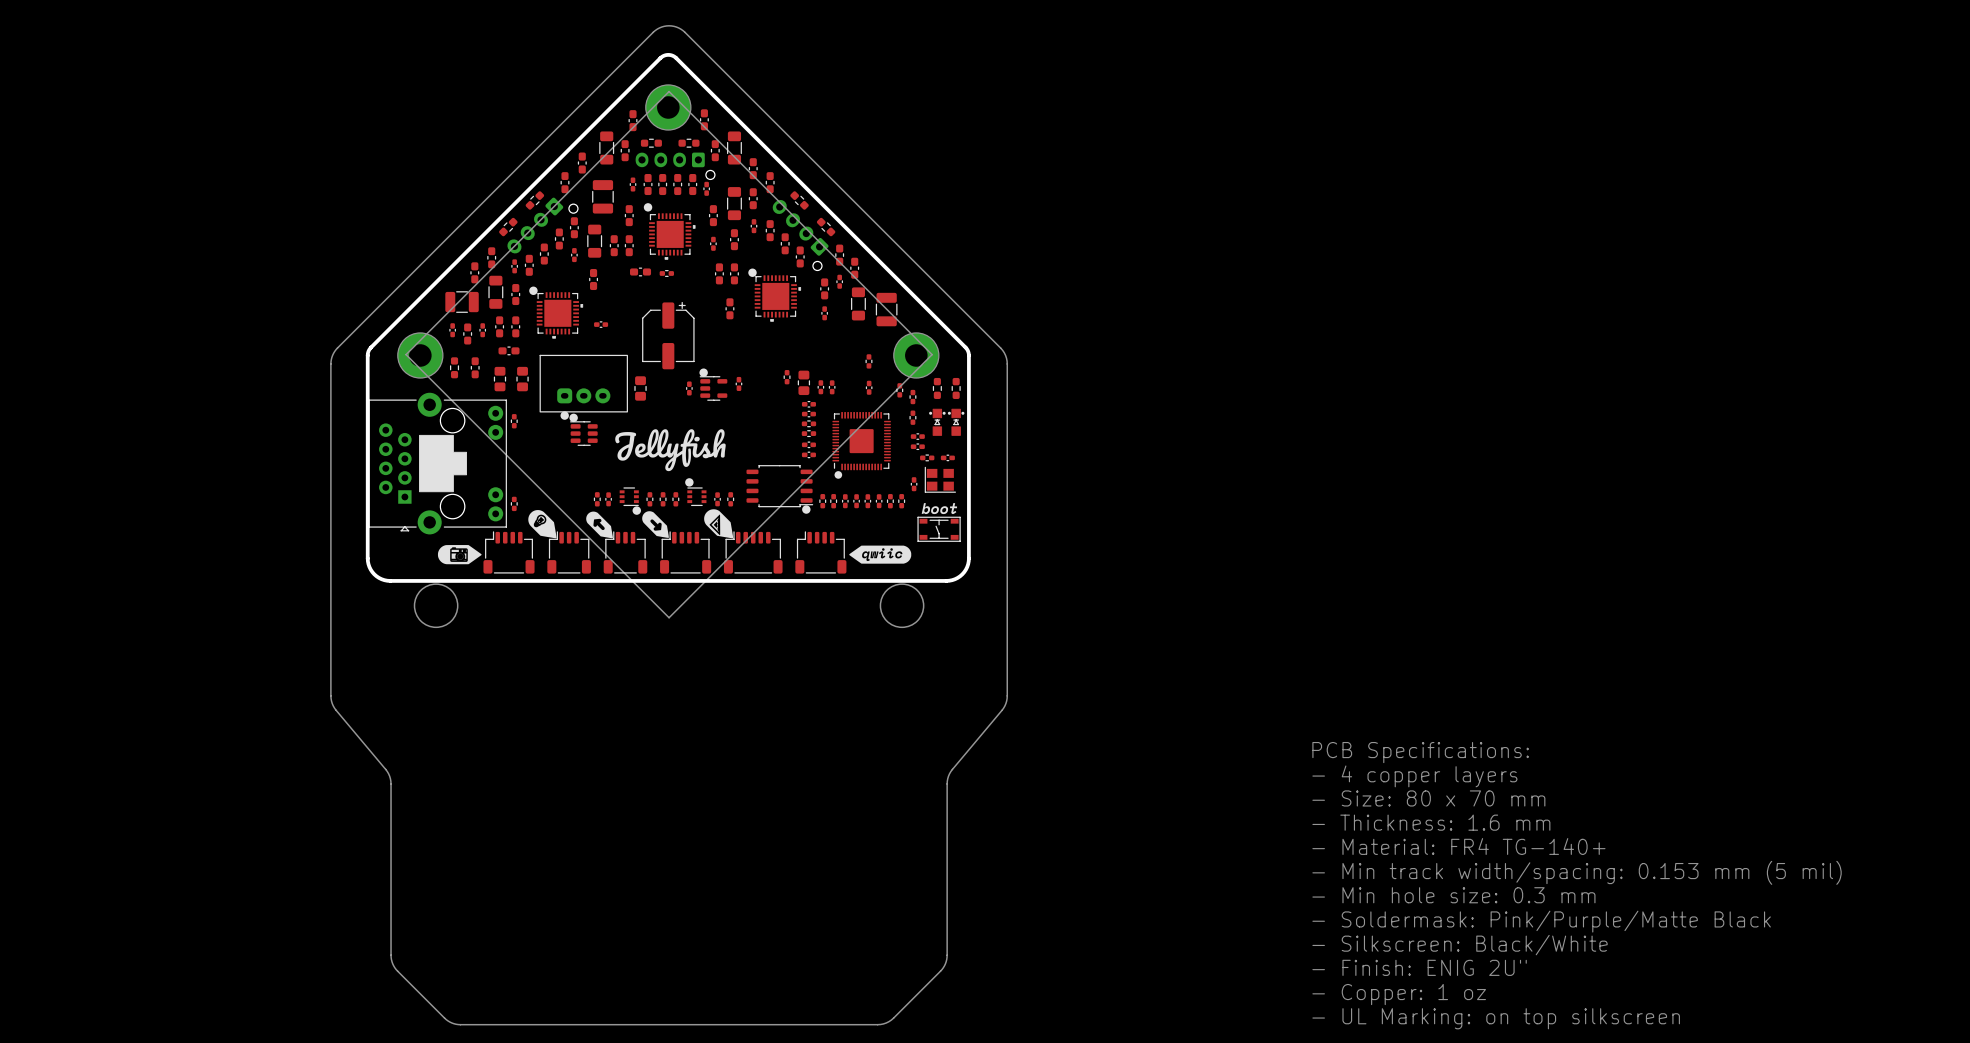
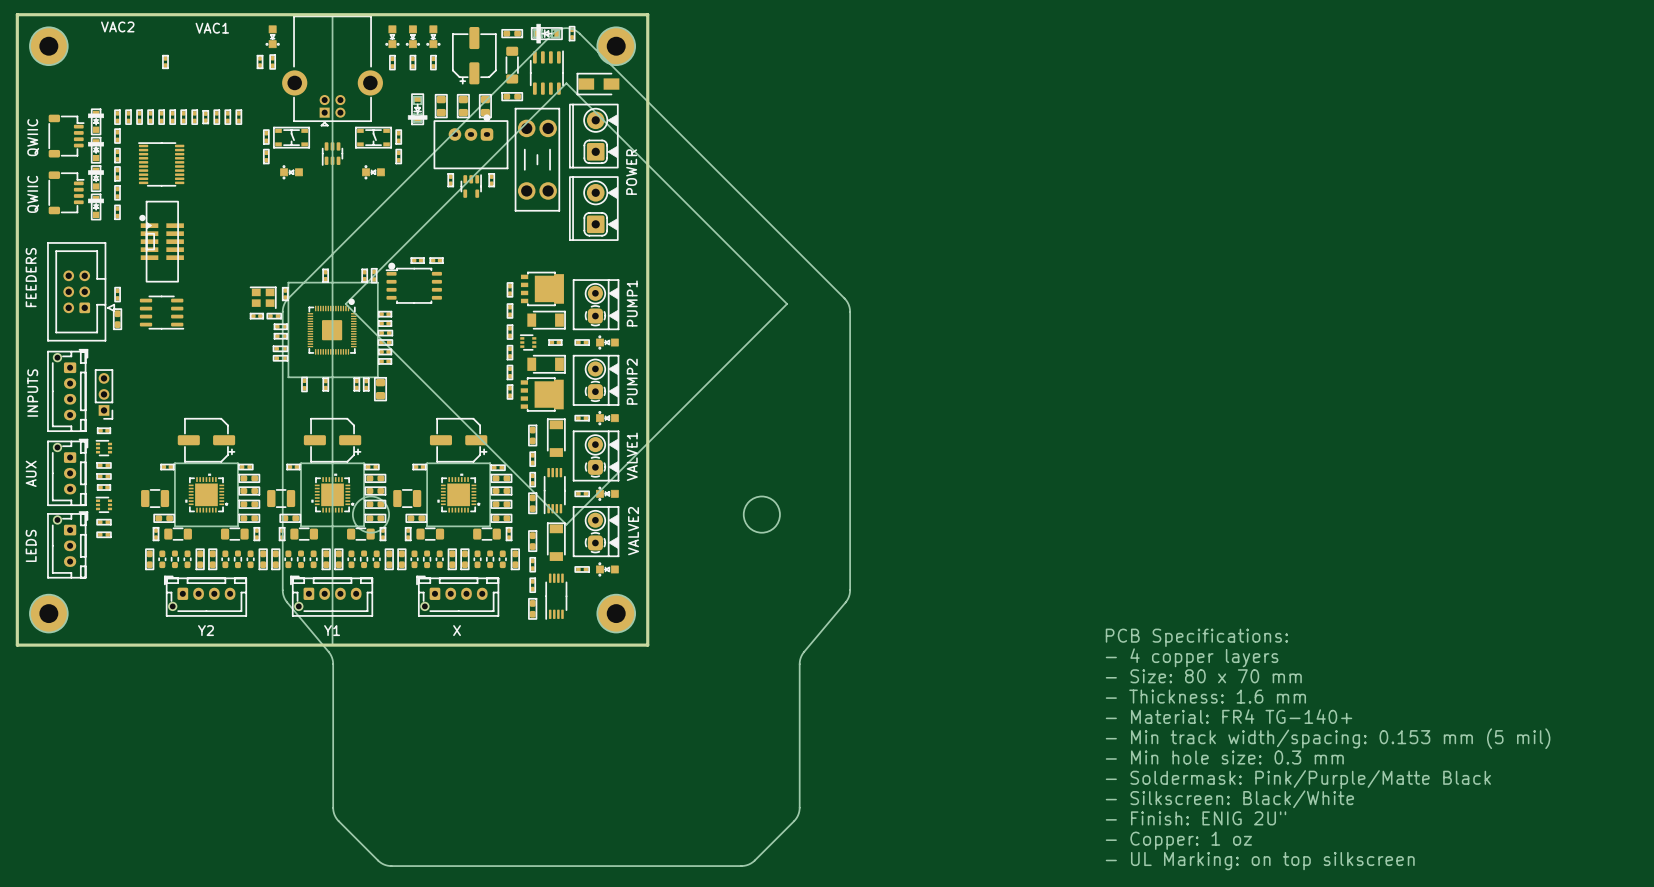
board edge: none -> (17, 14) (647, 14) (647, 645) (17, 645) (17, 14)
line: none -> (332, 14) (332, 645)
text: none -> VAC2 (117, 26)
text: none -> VAC1 (212, 28)
part: none -> (512, 33)
part: none -> (546, 33)
part: none -> (572, 33)
part: none -> (272, 36)
part: none -> (392, 36)
part: none -> (412, 36)
part: none -> (433, 36)
part: none -> (48, 46)
part: none -> (474, 55)
board edge: (660, 58) (369, 349) (367, 558) (370, 569) (379, 577) (390, 580) (946, 580) (957, 577) (965, 569) (968, 558) (967, 349) (676, 58) (668, 54) (660, 58) -> none
part: none -> (165, 61)
part: none -> (260, 61)
part: none -> (272, 61)
part: none -> (392, 62)
part: none -> (412, 62)
part: none -> (433, 62)
part: none -> (512, 65)
part: none -> (332, 70)
part: none -> (546, 72)
part: none -> (598, 84)
part: none -> (512, 96)
part position: (668, 107) -> (616, 46)
part: none -> (441, 106)
part: none -> (463, 106)
part: none -> (485, 106)
part: (704, 119) -> none
part: (633, 120) -> none
part: none -> (417, 109)
part: none -> (117, 117)
part: none -> (128, 117)
part: none -> (139, 117)
part: none -> (150, 117)
part: none -> (161, 117)
part: none -> (172, 117)
part: none -> (183, 117)
part: none -> (194, 117)
part: none -> (205, 117)
part: none -> (216, 117)
part: none -> (227, 117)
part: none -> (238, 117)
part: none -> (96, 121)
part: (651, 143) -> none
part: (688, 143) -> none
part: (606, 147) -> none
part: (734, 147) -> none
part: (625, 150) -> none
part: (715, 150) -> none
part: none -> (66, 136)
part: none -> (117, 136)
part: none -> (593, 136)
part: none -> (266, 137)
part: none -> (398, 137)
text: none -> QWIIC (33, 137)
part: none -> (291, 137)
part: none -> (373, 137)
part: none -> (470, 141)
part: (582, 163) -> none
part: (675, 166) -> none
part: (753, 168) -> none
part: none -> (96, 150)
part: none -> (332, 153)
part: none -> (117, 155)
part footprint: [629, 177, 637, 192] -> [515, 108, 560, 212]
part: none -> (266, 156)
part: none -> (398, 156)
part: (564, 182) -> none
part: (770, 182) -> none
part: (648, 184) -> none
part: (662, 184) -> none
part: (677, 184) -> none
part: (692, 184) -> none
part: none -> (161, 164)
part: (706, 188) -> none
part: (602, 196) -> none
part: none -> (291, 172)
part: none -> (373, 172)
text: none -> POWER (631, 172)
part: (753, 198) -> none
part: none -> (117, 173)
part: (534, 200) -> none
part: (799, 200) -> none
drawing: [643, 203, 653, 212] -> none
part: (734, 203) -> none
part: none -> (96, 178)
part: none -> (450, 180)
part: none -> (491, 180)
part: none -> (471, 186)
part: (629, 215) -> none
part: (713, 215) -> none
part: none -> (66, 192)
part: none -> (117, 192)
text: none -> QWIIC (33, 194)
part: (542, 225) -> none
part: (754, 226) -> none
part: (508, 227) -> none
part: (574, 227) -> none
part: (826, 227) -> none
part: (770, 230) -> none
part: (800, 235) -> none
part: (672, 236) -> none
part: none -> (96, 206)
part: (559, 239) -> none
part: (734, 239) -> none
part: none -> (593, 208)
part: (594, 241) -> none
part: (713, 243) -> none
part: (785, 243) -> none
part: none -> (117, 212)
part: (614, 245) -> none
part: (629, 245) -> none
part: (544, 254) -> none
part: (574, 255) -> none
part: (839, 255) -> none
part: (800, 256) -> none
part: (491, 257) -> none
part: (529, 265) -> none
part: (514, 266) -> none
drawing: [748, 268, 757, 277] -> none
part: (854, 268) -> none
part: (640, 271) -> none
part: (474, 272) -> none
part: (666, 273) -> none
part: (719, 273) -> none
part: (734, 273) -> none
part: (593, 279) -> none
part: none -> (161, 241)
part: (839, 281) -> none
part: (824, 288) -> none
drawing position: (533, 290) -> (391, 266)
part: (495, 292) -> none
part: (515, 294) -> none
part: (777, 298) -> none
part: (462, 302) -> none
part: none -> (417, 260)
part: none -> (436, 260)
part: (858, 303) -> none
part: (729, 308) -> none
part: (886, 309) -> none
part: (824, 313) -> none
part: (559, 315) -> none
part: none -> (325, 275)
part: none -> (364, 275)
part: none -> (374, 275)
text: none -> FEEDERS (31, 277)
part footprint: [479, 323, 486, 338] -> [386, 268, 442, 304]
part: (601, 324) -> none
part: (499, 326) -> none
part: (515, 326) -> none
line: none -> (288, 282) (288, 377) (377, 377) (377, 282) (288, 282)
part: (452, 330) -> none
part: (467, 333) -> none
part: (668, 335) -> none
part: none -> (542, 288)
part: none -> (510, 289)
part: none -> (81, 291)
part: none -> (285, 294)
part: none -> (117, 294)
part: none -> (263, 297)
part: (509, 350) -> none
text: none -> PUMP1 (632, 303)
part: (420, 355) -> none
part: none -> (596, 304)
part: (916, 355) -> none
part footprint: [450, 357, 459, 379] -> [378, 311, 392, 318]
part: (868, 361) -> none
part: none -> (510, 310)
part: none -> (161, 312)
part: (475, 367) -> none
drawing: [699, 368, 708, 377] -> none
part: none -> (256, 316)
part: none -> (274, 316)
part: none -> (117, 319)
part: none -> (546, 320)
part: (787, 377) -> none
part: none -> (385, 323)
part: (499, 379) -> none
part: (522, 379) -> none
part: none -> (280, 326)
part: none -> (332, 326)
part: (803, 382) -> none
part: (738, 383) -> none
part: (583, 387) -> none
part: (820, 387) -> none
part: (832, 387) -> none
part: (869, 387) -> none
part: none -> (510, 332)
part: (640, 388) -> none
part: (689, 388) -> none
part: (713, 388) -> none
part: (937, 388) -> none
part: (956, 388) -> none
part: none -> (385, 333)
part: (899, 390) -> none
part: none -> (280, 336)
part: (912, 397) -> none
part: none -> (385, 342)
part: none -> (528, 342)
part: none -> (555, 342)
part: none -> (582, 342)
part: none -> (607, 342)
part: (808, 404) -> none
part: none -> (280, 348)
part: none -> (385, 351)
part: none -> (510, 352)
drawing: [569, 413, 578, 423] -> none
part: (808, 414) -> none
part: (912, 417) -> none
part: none -> (280, 358)
part: (514, 421) -> none
part: (937, 422) -> none
part: (956, 422) -> none
part: none -> (385, 361)
part: (808, 423) -> none
part: none -> (546, 364)
drawing: [615, 429, 726, 487] -> none
part: (583, 433) -> none
part: (808, 433) -> none
part: none -> (510, 372)
part: (917, 436) -> none
part: (808, 444) -> none
part: none -> (596, 380)
part: (861, 445) -> none
part: (917, 446) -> none
text: none -> PUMP2 (632, 381)
part: none -> (304, 384)
part: none -> (325, 384)
part: none -> (356, 384)
part: none -> (366, 384)
part: (808, 454) -> none
part: none -> (380, 389)
part: none -> (67, 390)
part: (927, 457) -> none
part: (947, 457) -> none
part: none -> (510, 392)
text: none -> INPUTS (32, 393)
part: none -> (104, 394)
part: none -> (542, 394)
part: (437, 463) -> none
part: (940, 479) -> none
part: (914, 484) -> none
part: (779, 486) -> none
part: none -> (582, 418)
part: none -> (607, 418)
part: (629, 496) -> none
part: (696, 496) -> none
part: (597, 499) -> none
part: (608, 499) -> none
part: (649, 499) -> none
part: (663, 499) -> none
part: (675, 499) -> none
part: (717, 499) -> none
part: (730, 499) -> none
part: (822, 501) -> none
part: (833, 501) -> none
part: (845, 501) -> none
part: (856, 501) -> none
part: (867, 501) -> none
part: (879, 501) -> none
part: (890, 501) -> none
part: (901, 501) -> none
part: (514, 503) -> none
drawing: [921, 503, 958, 515] -> none
part: none -> (104, 430)
drawing: [802, 505, 811, 514] -> none
drawing: [632, 506, 669, 538] -> none
drawing: [704, 509, 734, 539] -> none
drawing: [528, 510, 557, 539] -> none
drawing: [586, 511, 613, 539] -> none
part: none -> (532, 435)
part: none -> (556, 437)
part: none -> (206, 440)
part: none -> (332, 440)
part: none -> (458, 440)
part: none -> (104, 448)
part: (939, 529) -> none
part: none -> (596, 455)
text: none -> VALVE1 (632, 456)
part: none -> (532, 459)
line: none -> (174, 463) (237, 463) (237, 526) (174, 526) (174, 463)
line: none -> (301, 463) (301, 526) (364, 526) (364, 463) (301, 463)
line: none -> (427, 463) (490, 463) (490, 526) (427, 526) (427, 463)
drawing: [437, 545, 482, 565] -> none
drawing: [849, 545, 912, 564] -> none
part: none -> (104, 465)
part: none -> (167, 467)
part: none -> (245, 467)
part: none -> (293, 467)
part: none -> (371, 467)
part: none -> (419, 467)
part: none -> (498, 467)
part: (509, 552) -> none
part: (569, 552) -> none
part: (625, 552) -> none
part: (685, 552) -> none
part: (753, 552) -> none
part: (820, 552) -> none
part: none -> (67, 472)
text: none -> AUX (31, 473)
part: none -> (104, 476)
part: none -> (249, 478)
part: none -> (375, 478)
part: none -> (501, 478)
part: none -> (532, 479)
part: none -> (104, 487)
part: none -> (249, 490)
part: none -> (375, 490)
part: none -> (501, 490)
part: none -> (554, 490)
part: none -> (204, 493)
part: none -> (330, 493)
part: none -> (456, 493)
part: none -> (582, 493)
part: none -> (607, 493)
part: none -> (155, 498)
part: none -> (281, 498)
part: none -> (407, 498)
part: none -> (532, 503)
part: none -> (249, 504)
part: none -> (375, 504)
part: none -> (501, 504)
part: none -> (104, 504)
part: none -> (164, 518)
part: none -> (249, 518)
part: none -> (290, 518)
part: none -> (375, 518)
part: none -> (416, 518)
part: none -> (501, 518)
part: none -> (104, 522)
text: none -> VALVE2 (633, 531)
part: none -> (596, 531)
part: none -> (156, 534)
part: none -> (178, 534)
part: none -> (234, 534)
part: none -> (256, 534)
part: none -> (282, 534)
part: none -> (304, 534)
part: none -> (360, 534)
part: none -> (382, 534)
part: none -> (408, 534)
part: none -> (430, 534)
part: none -> (486, 534)
part: none -> (509, 534)
part: none -> (104, 534)
part: none -> (532, 541)
part: none -> (556, 541)
part: none -> (67, 544)
text: none -> LEDS (31, 545)
part: none -> (149, 559)
part: none -> (162, 559)
part: none -> (174, 559)
part: none -> (187, 559)
part: none -> (200, 559)
part: none -> (212, 559)
part: none -> (225, 559)
part: none -> (237, 559)
part: none -> (250, 559)
part: none -> (263, 559)
part: none -> (275, 559)
part: none -> (288, 559)
part: none -> (301, 559)
part: none -> (313, 559)
part: none -> (326, 559)
part: none -> (338, 559)
part: none -> (351, 559)
part: none -> (364, 559)
part: none -> (376, 559)
part: none -> (389, 559)
part: none -> (401, 559)
part: none -> (414, 559)
part: none -> (427, 559)
part: none -> (439, 559)
part: none -> (452, 559)
part: none -> (464, 559)
part: none -> (477, 559)
part: none -> (490, 559)
part: none -> (502, 559)
part: none -> (515, 559)
part: none -> (532, 564)
part: none -> (582, 569)
part: none -> (607, 569)
part: none -> (532, 585)
part: none -> (205, 596)
part: none -> (331, 596)
part: none -> (457, 596)
part: none -> (556, 596)
part: none -> (532, 608)
part: none -> (48, 613)
part: none -> (616, 613)
text: none -> Y2 (206, 630)
text: none -> Y1 (332, 630)
text: none -> X (457, 630)

